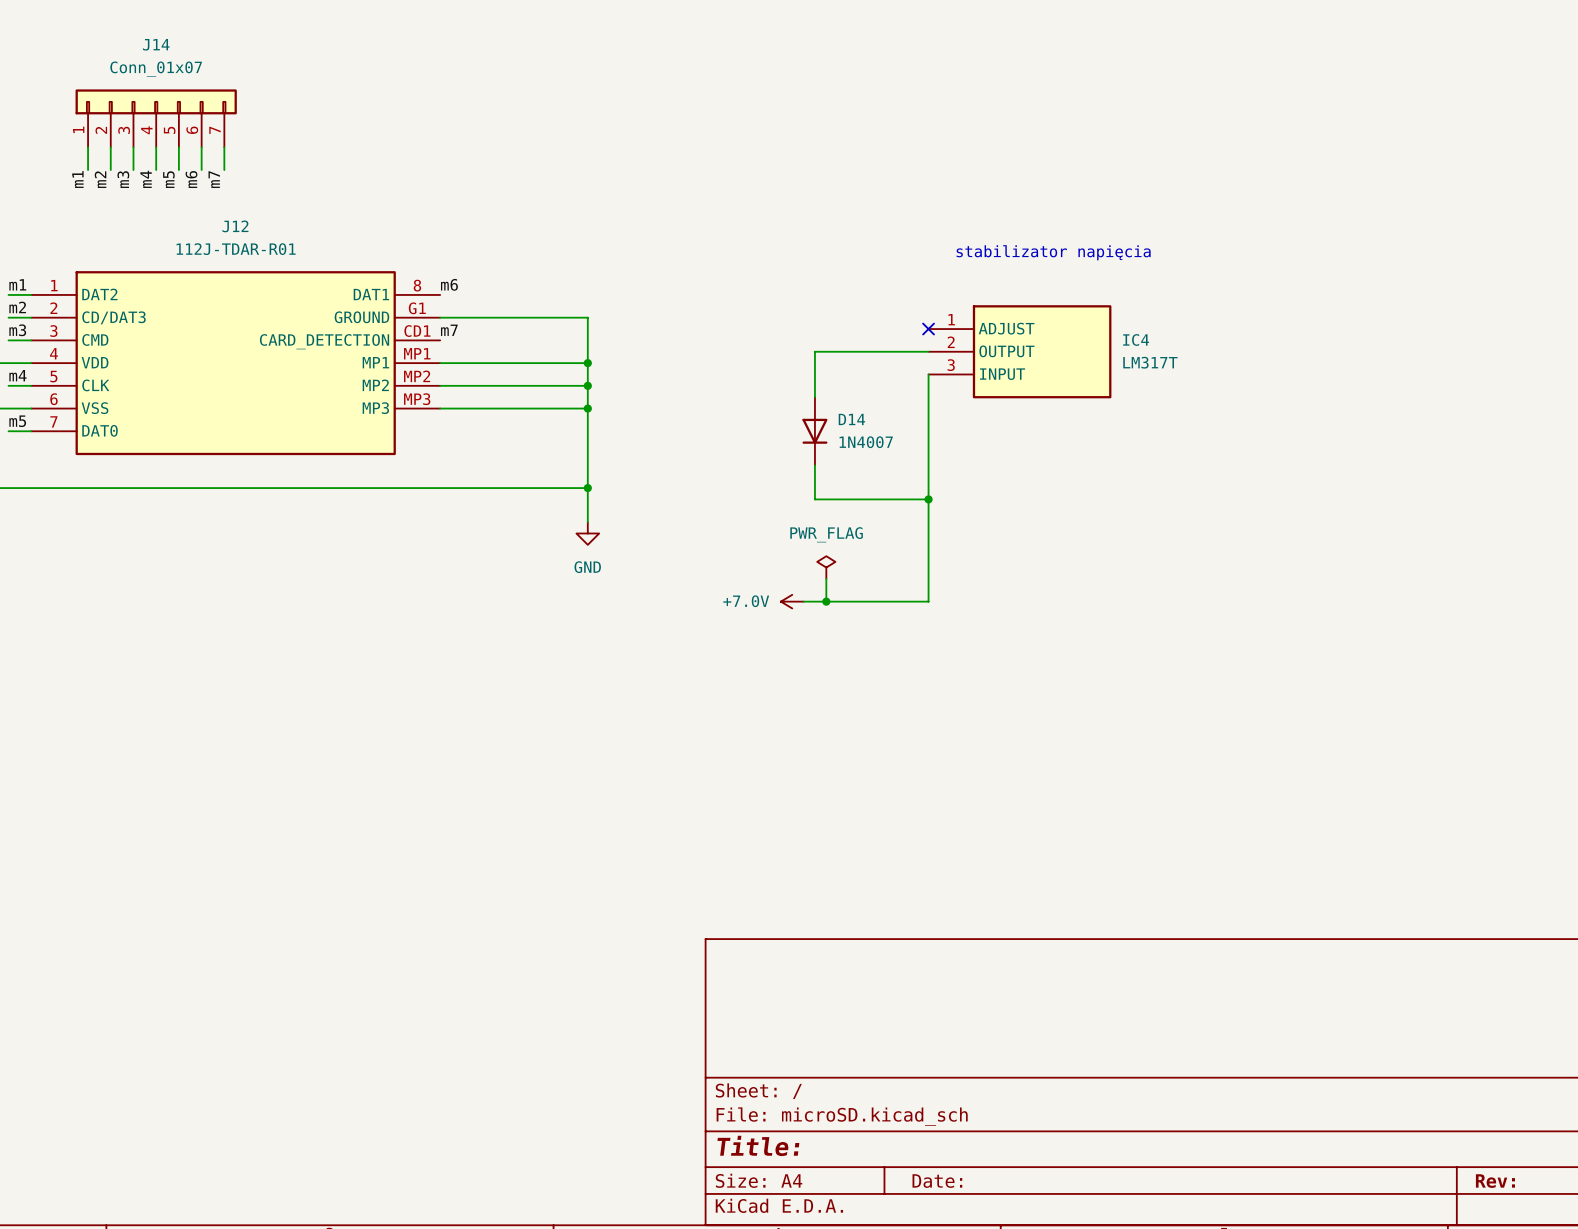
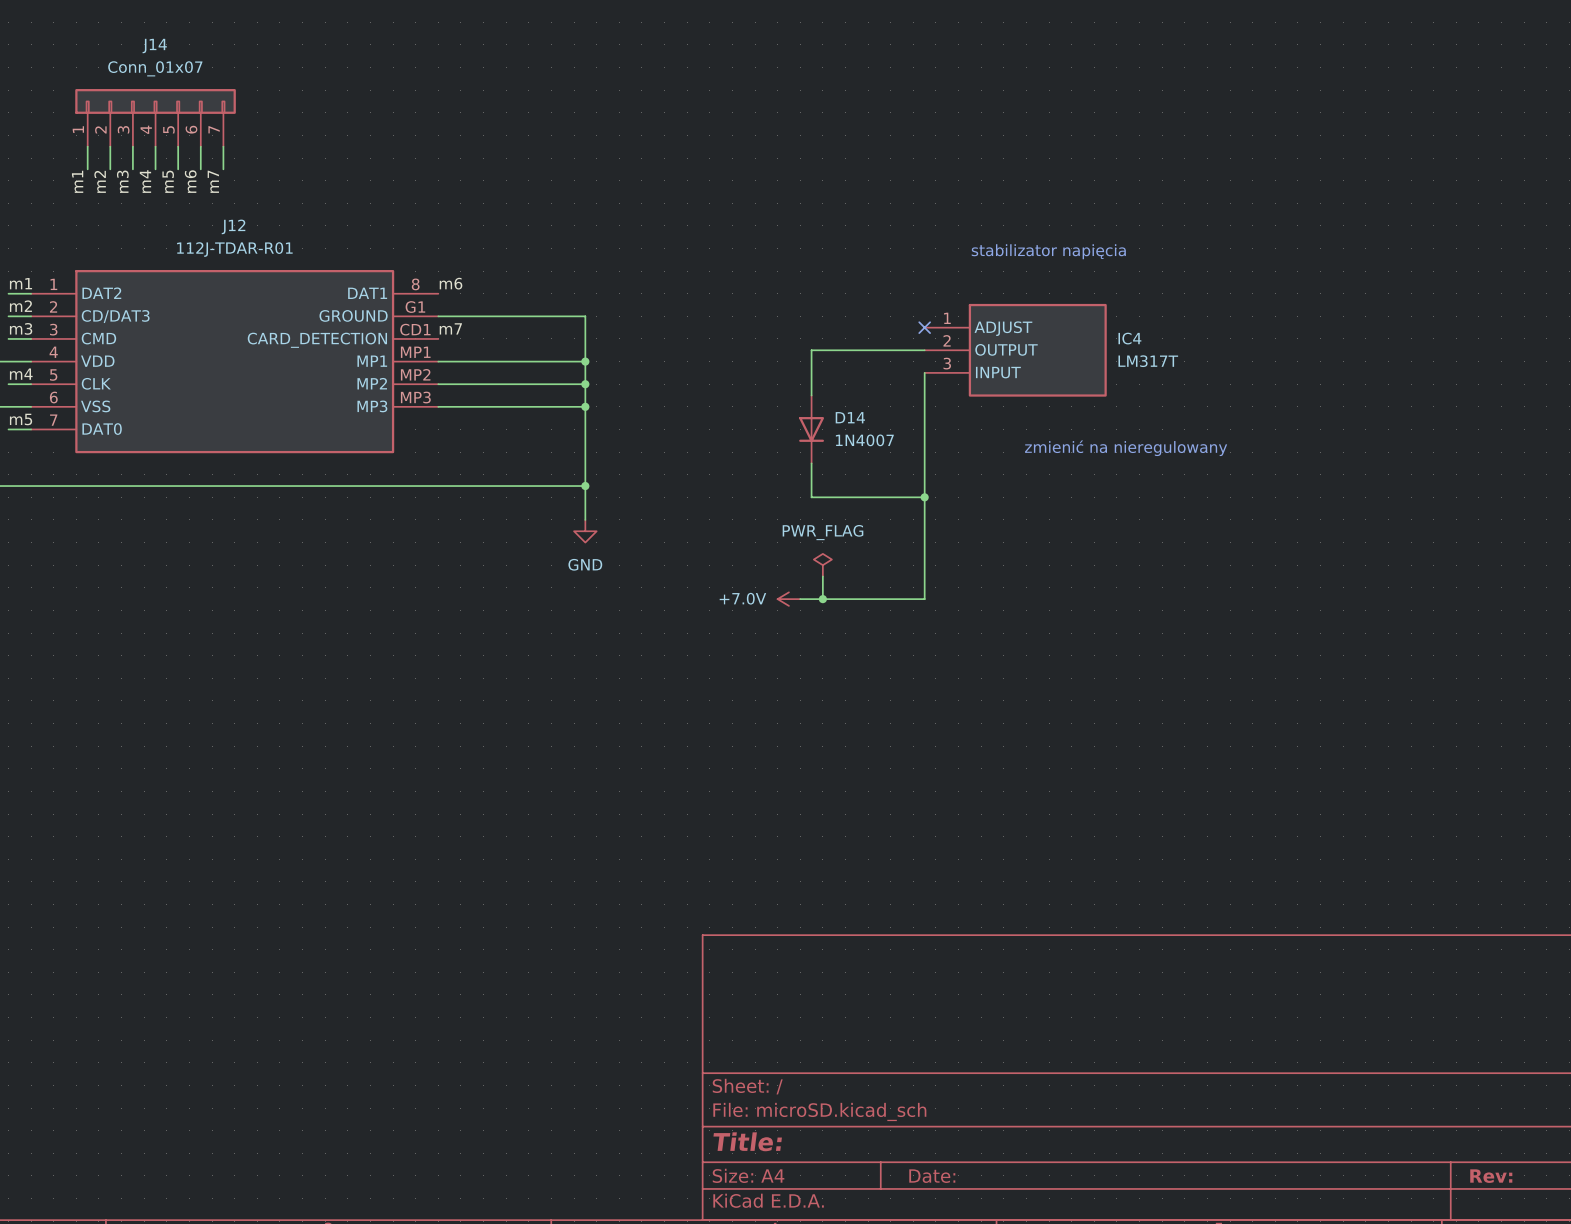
text: none -> zmienić na nieregulowany (1126, 448)

